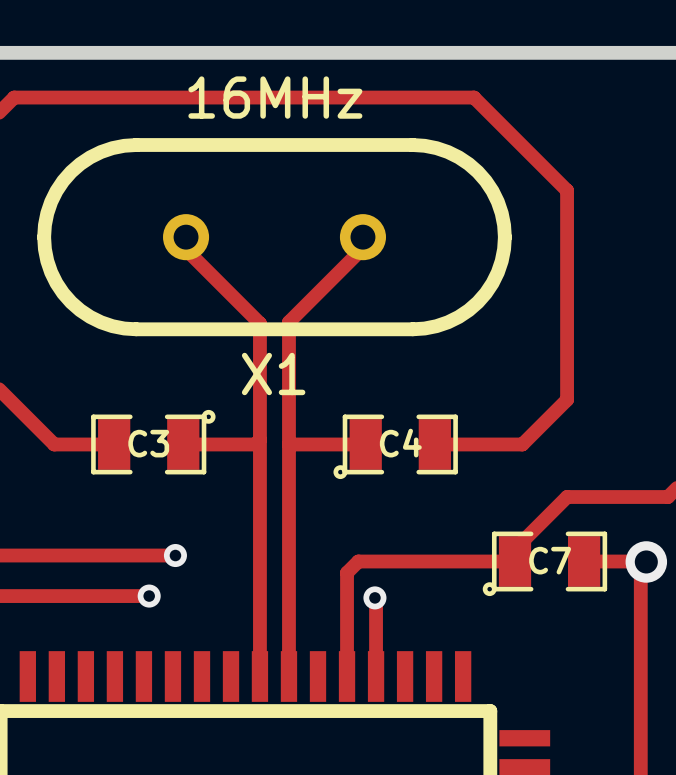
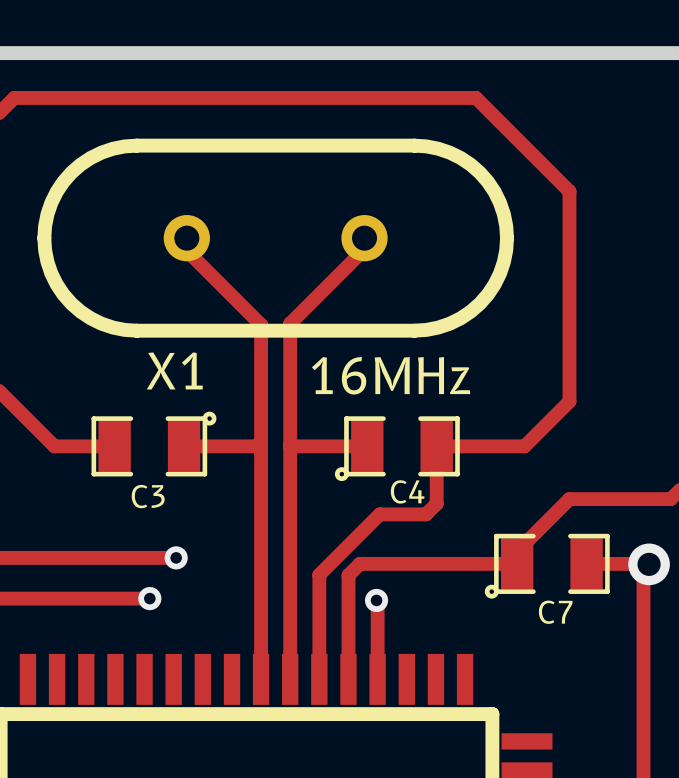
X1 value position: 16MHz (275, 97) -> 16MHz (391, 375)
X1 name position: X1 (273, 373) -> X1 (174, 370)
C3 name position: C3 (148, 443) -> C3 (148, 496)
C4 name position: C4 (400, 443) -> C4 (407, 491)
track: none -> (436, 446) (436, 503) (426, 514) (379, 514) (319, 574) (319, 679)
C7 name position: C7 (550, 560) -> C7 (555, 612)

